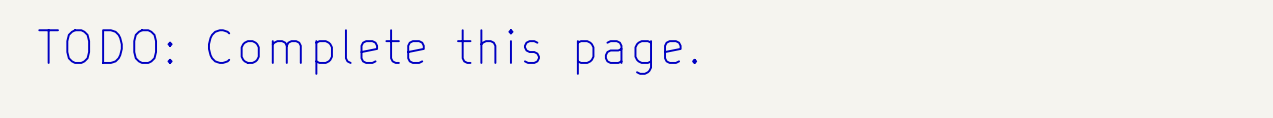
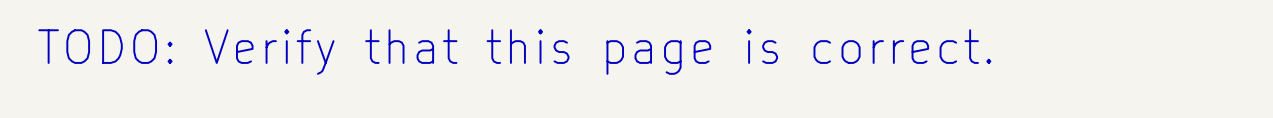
text: TODO: Complete this page. (367, 52) -> TODO: Verify that this page is correct. (514, 52)

